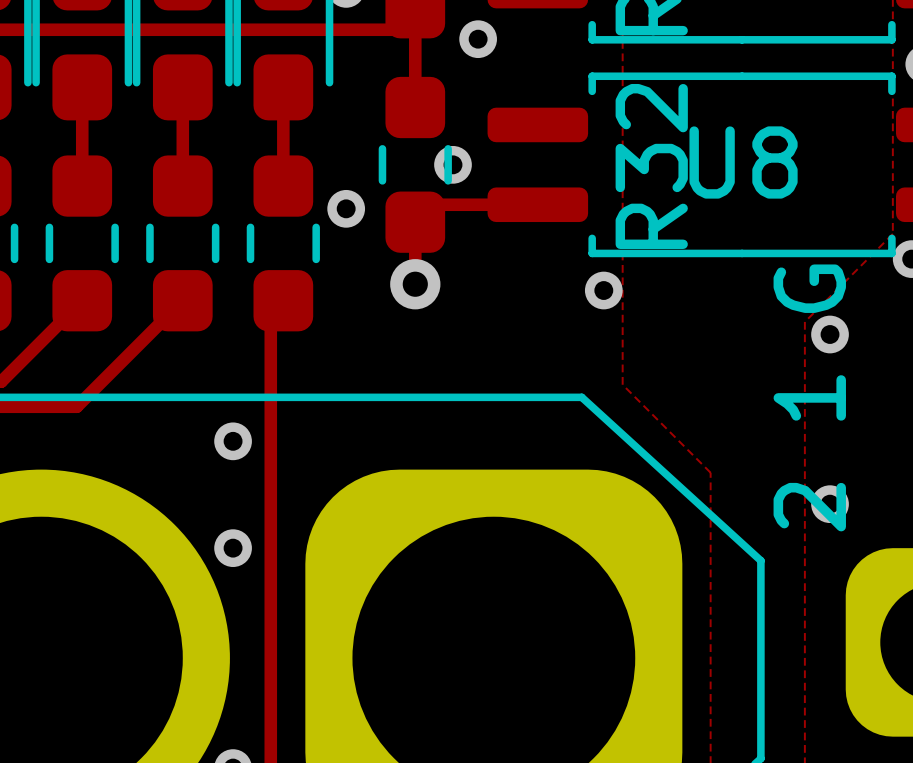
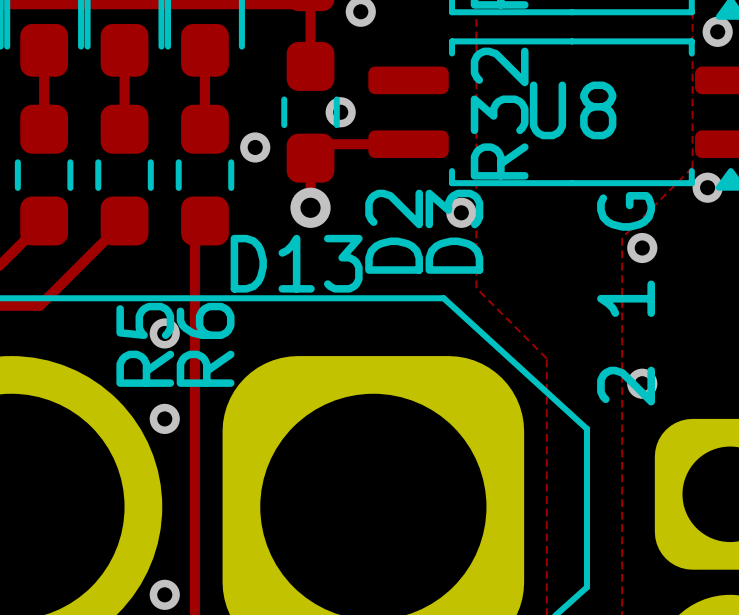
D2 name: none -> D2 (394, 231)
D3 name: none -> D3 (454, 231)
D13 name: none -> D13 (296, 263)
R5 name: none -> R5 (145, 344)
R6 name: none -> R6 (205, 344)

